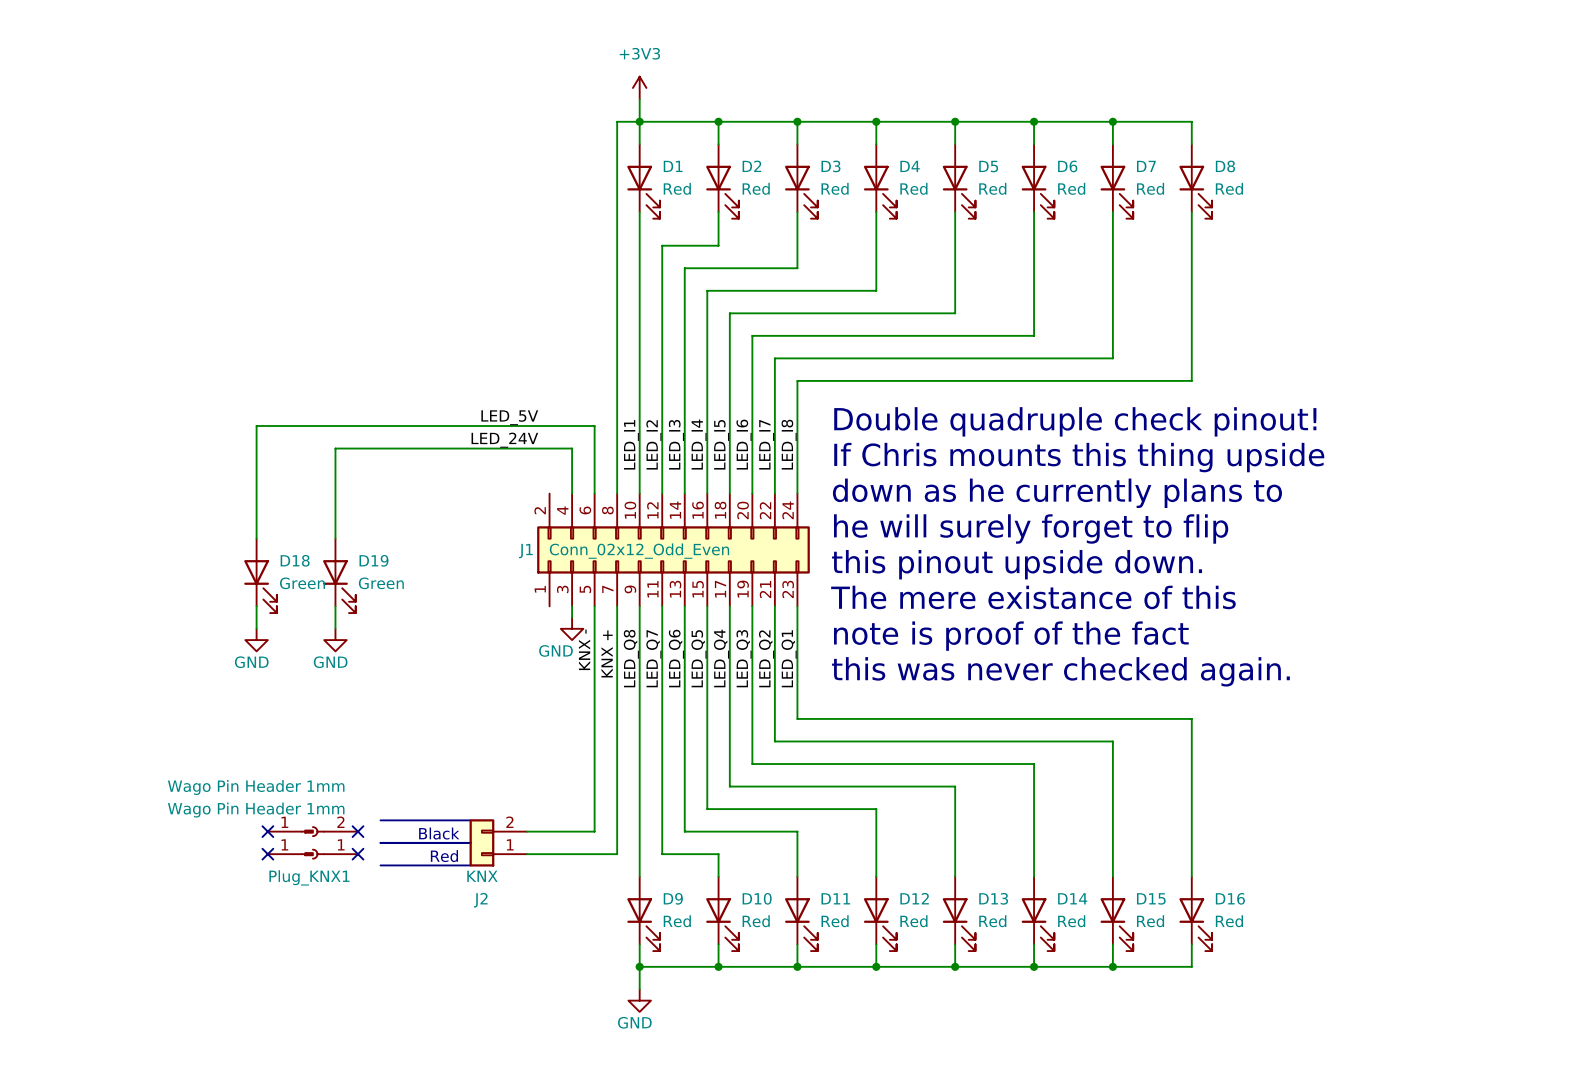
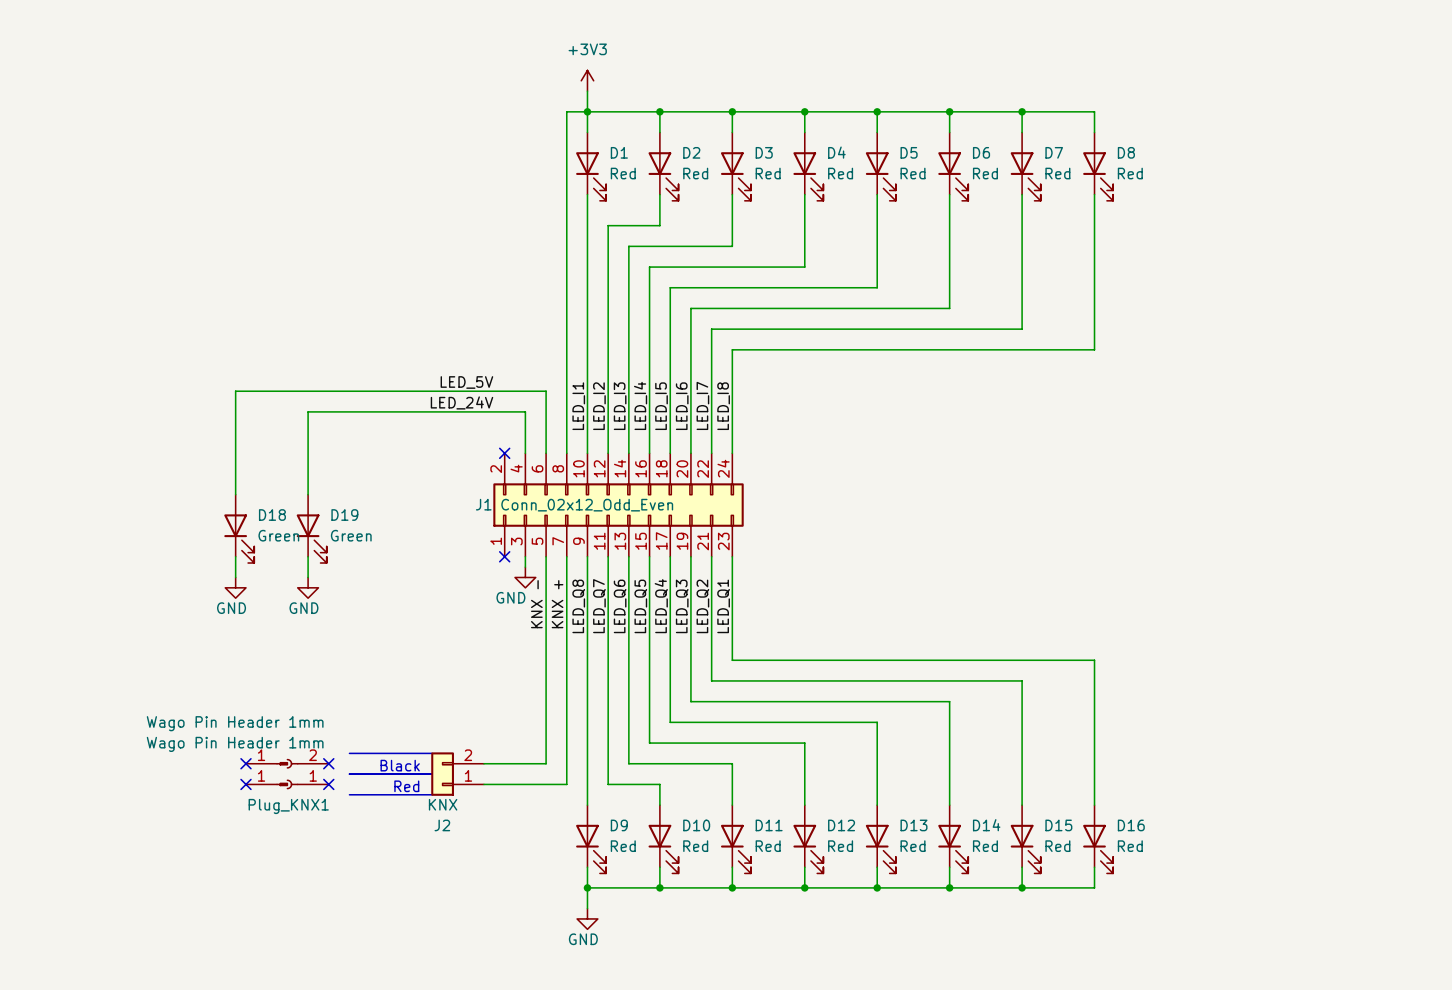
text: Double quadruple check pinout! (1075, 421) -> none
text: If Chris mounts this thing upside (1079, 457) -> none
no-connect mark: none -> (504, 453)
text: down as he currently plans to (1057, 493) -> none
text: he will surely forget to flip (1031, 528) -> none
text: this pinout upside down. (1017, 564) -> none
text: The mere existance of this (1033, 597) -> none
no-connect mark: none -> (504, 556)
text: note is proof of the fact (1011, 636) -> none
text: this was never checked again. (1060, 671) -> none

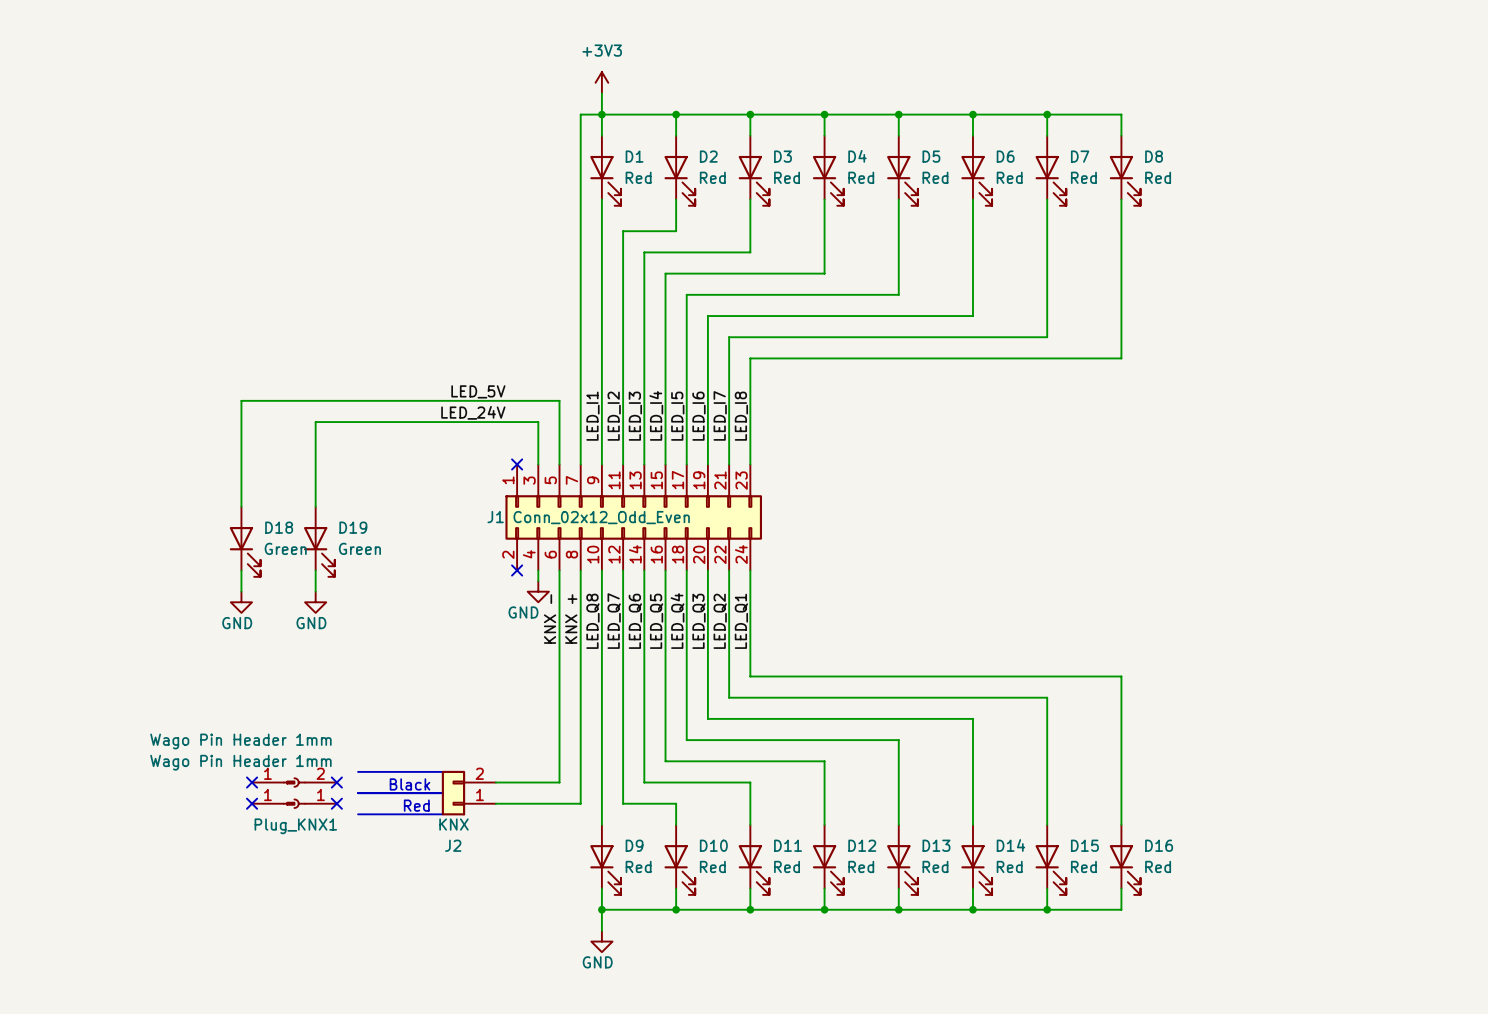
J1 flip: as is (618, 505) -> up-down (633, 517)

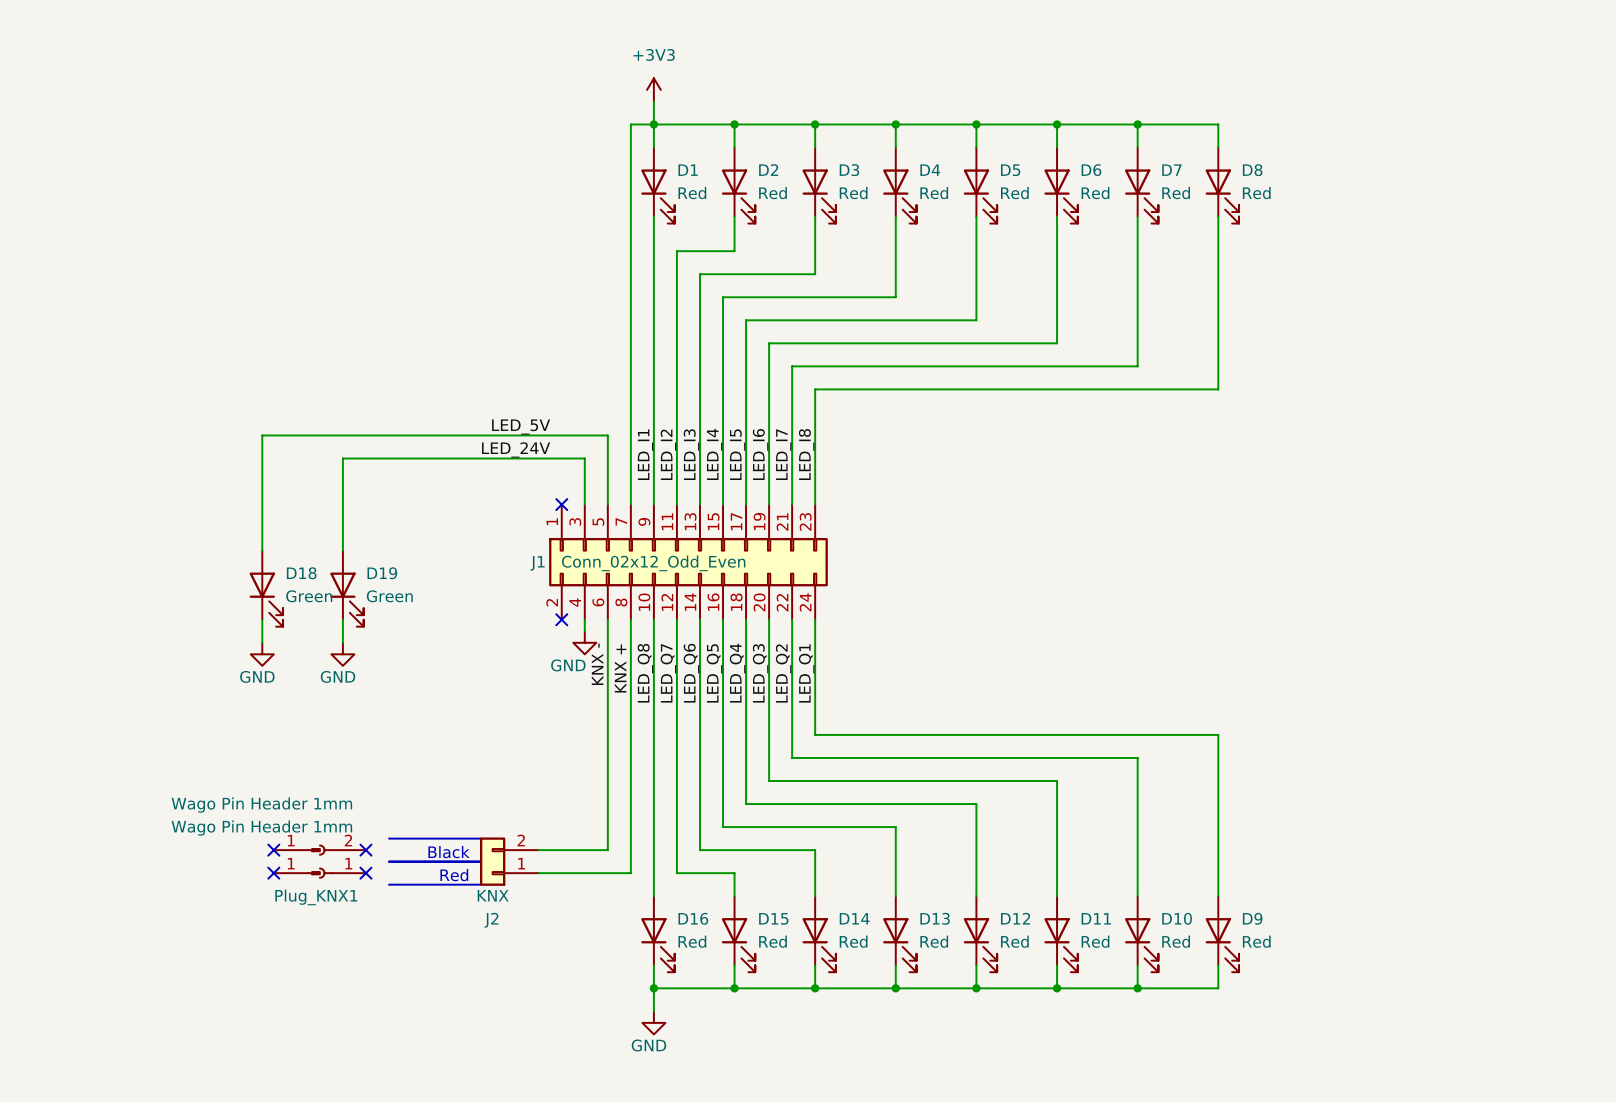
D9 name: D9 (634, 845) -> D16 (693, 918)
D10 name: D10 (713, 845) -> D15 (773, 918)
D11 name: D11 (788, 845) -> D14 (854, 918)
D12 name: D12 (862, 845) -> D13 (935, 918)
D13 name: D13 (936, 845) -> D12 (1015, 918)
D14 name: D14 (1010, 845) -> D11 (1096, 918)
D15 name: D15 (1084, 845) -> D10 (1177, 918)
D16 name: D16 (1159, 845) -> D9 (1252, 918)

